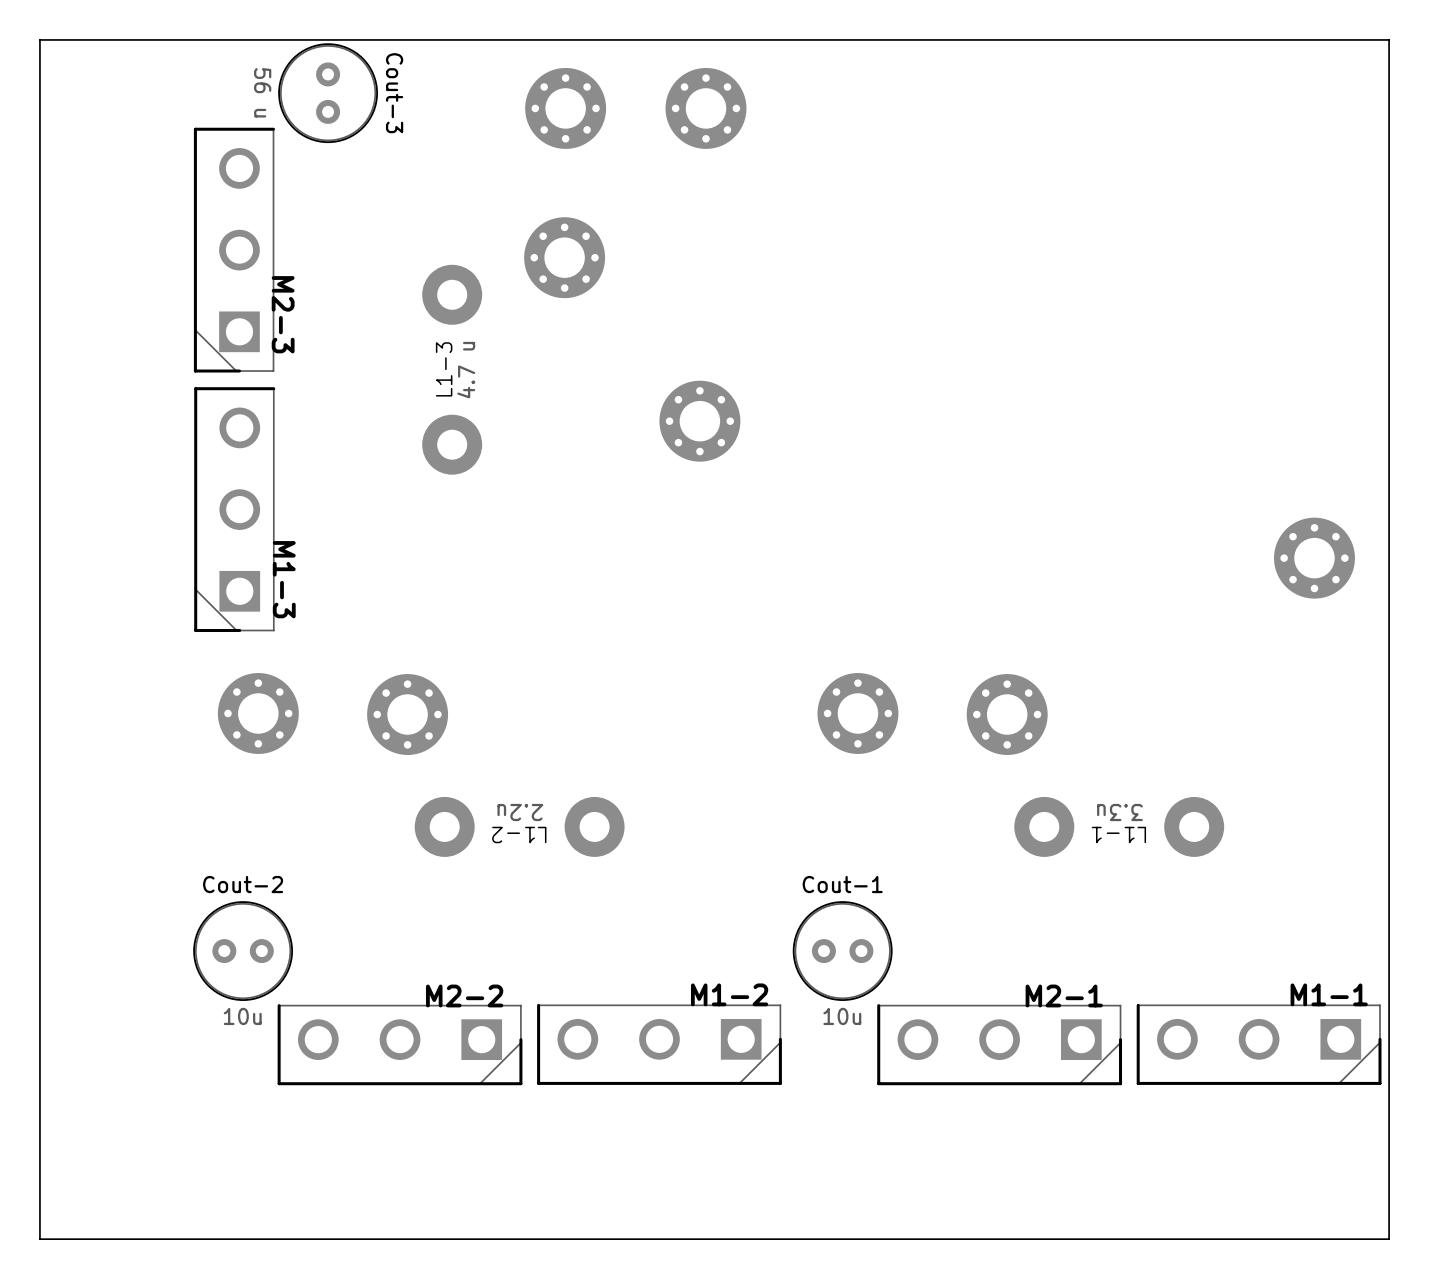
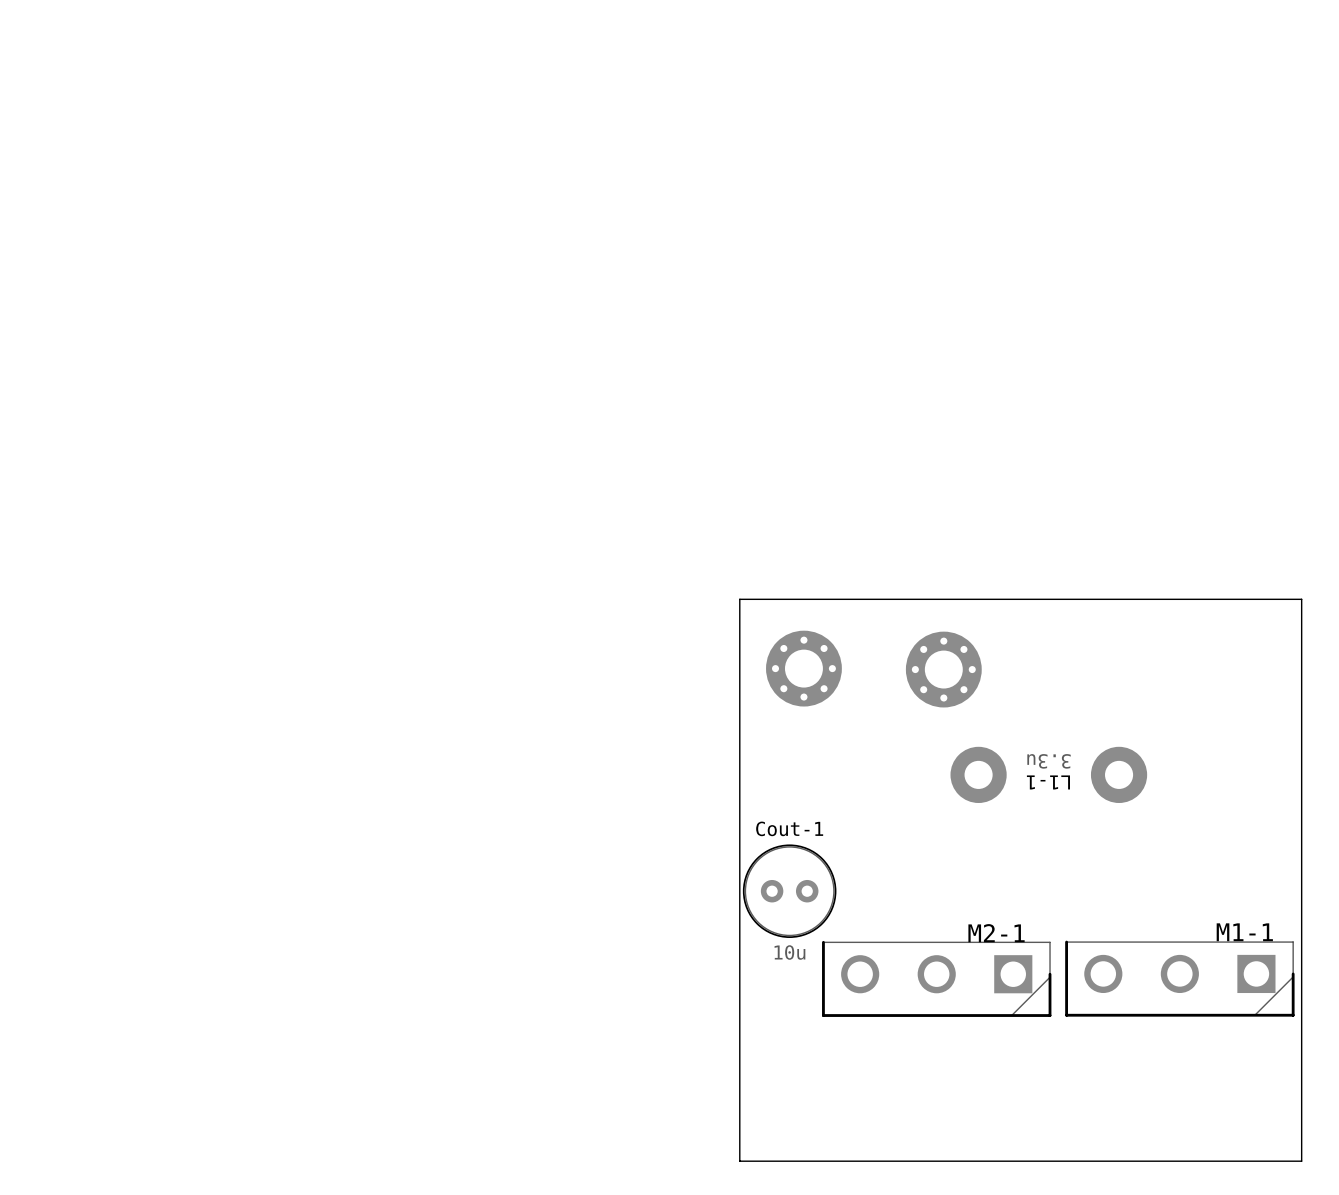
Cout-3: 56 u (328, 93) -> none
part: (565, 108) -> none
part: (706, 108) -> none
M2-3: (234, 250) -> none
part: (564, 257) -> none
L1-3: 4.7 u (452, 369) -> none
part: (699, 421) -> none
M1-3: (234, 509) -> none
part: (1314, 558) -> none
board edge: (1389, 639) (1389, 39) (39, 39) (39, 1239) (789, 1239) -> (1301, 599) (739, 599) (739, 1161)
part: (258, 713) -> none
part: (407, 714) -> none
L1-2: 2.2u (519, 826) -> none
Cout-2: 10u (243, 951) -> none
M2-2: (400, 1044) -> none
M1-2: (659, 1044) -> none

